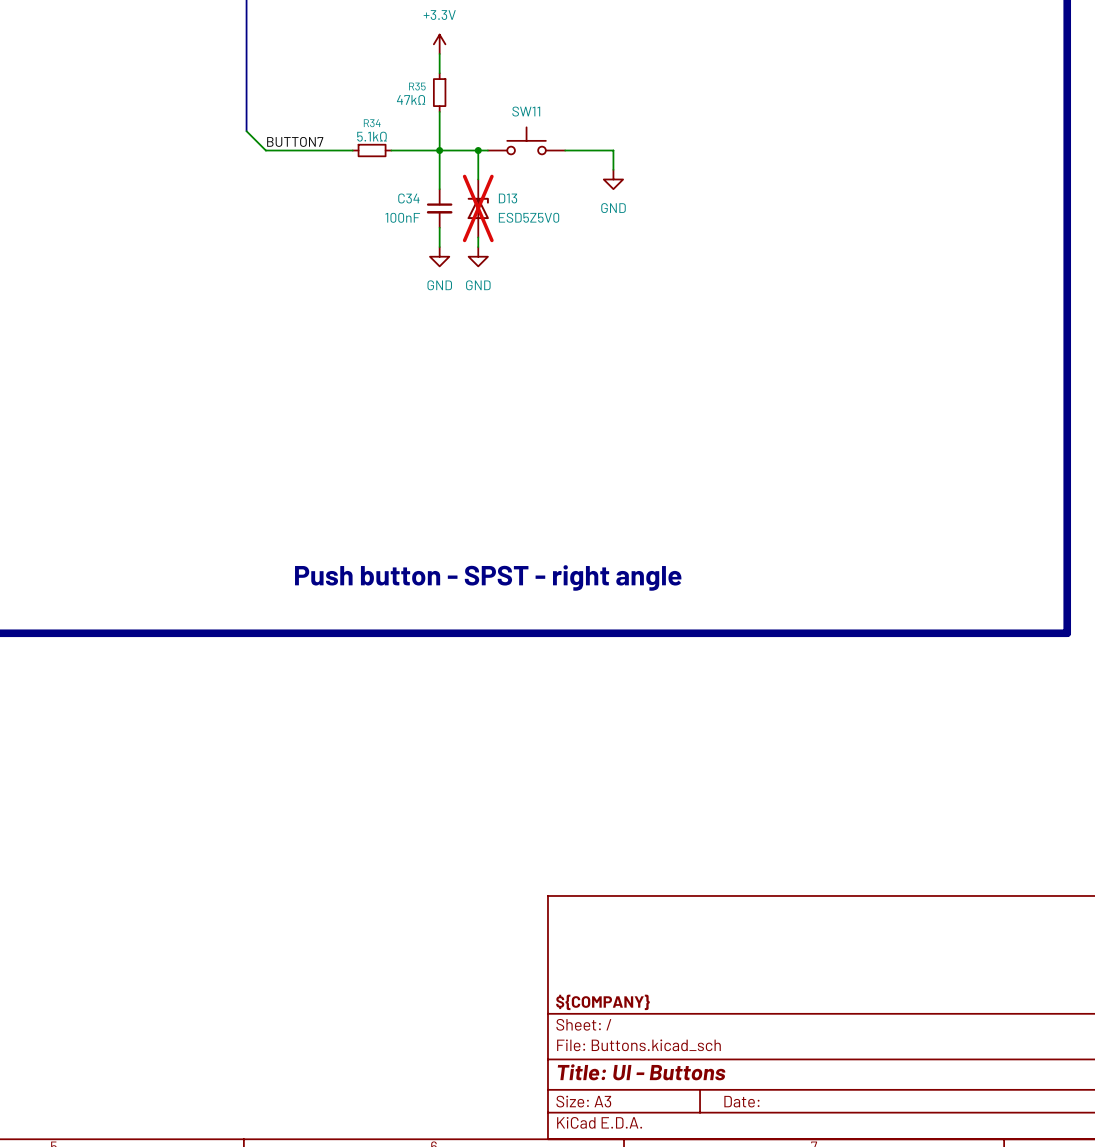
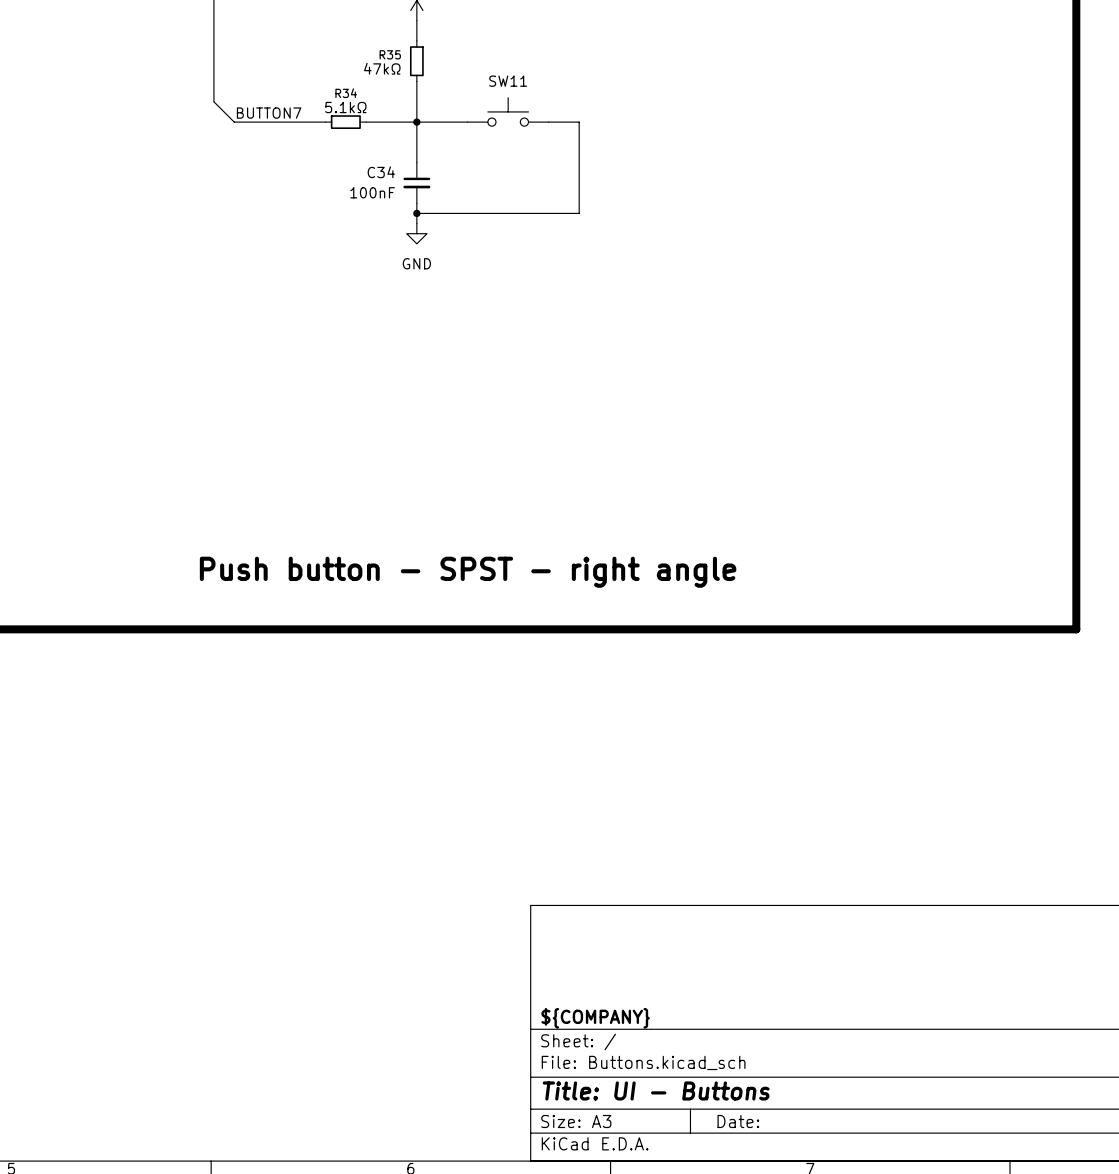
wire: (478, 150) (478, 179) -> none
junction: (478, 150) -> none
wire: (594, 150) (613, 150) (613, 169) -> (579, 122) (579, 213) (416, 213)
power symbol: GND (613, 179) -> none
D13: ESD5Z5V0 (478, 208) -> none
junction: none -> (416, 213)
wire: (478, 237) (478, 247) -> none
power symbol: GND (478, 256) -> none

